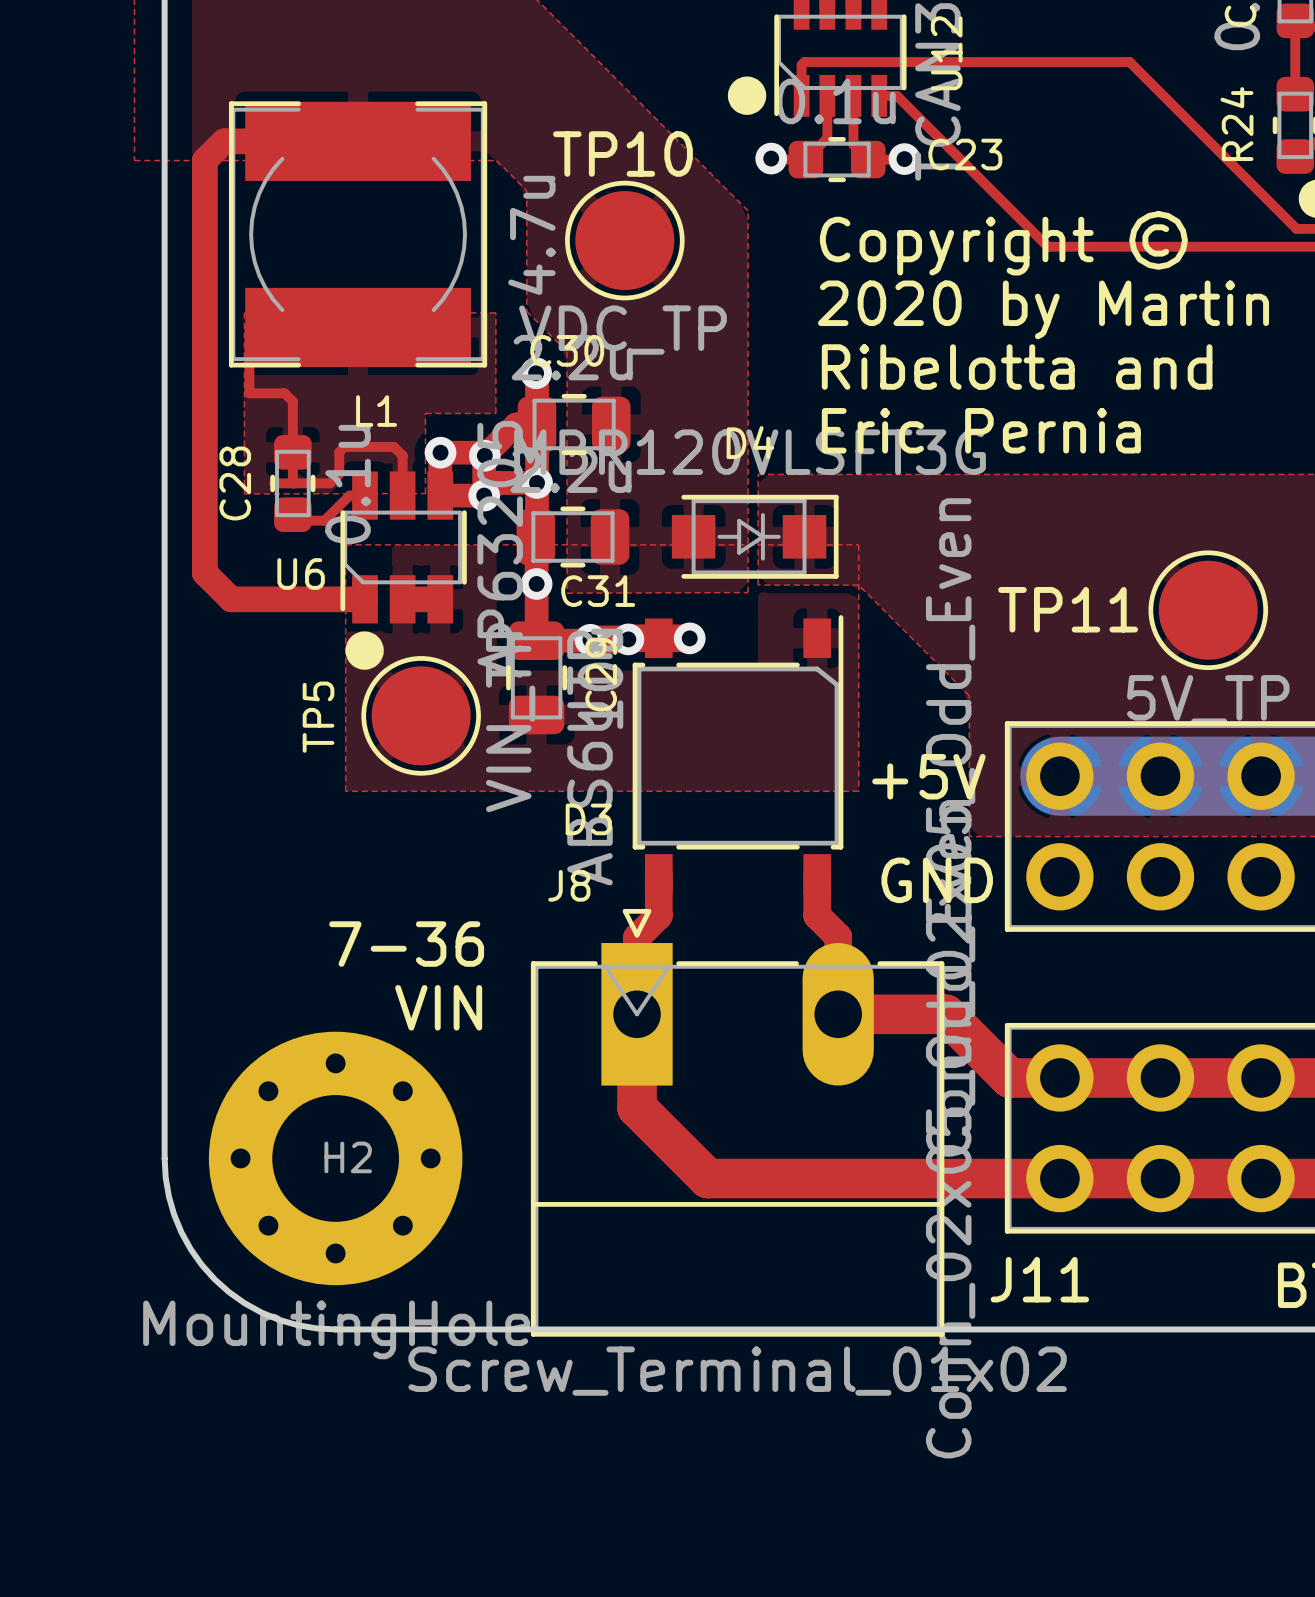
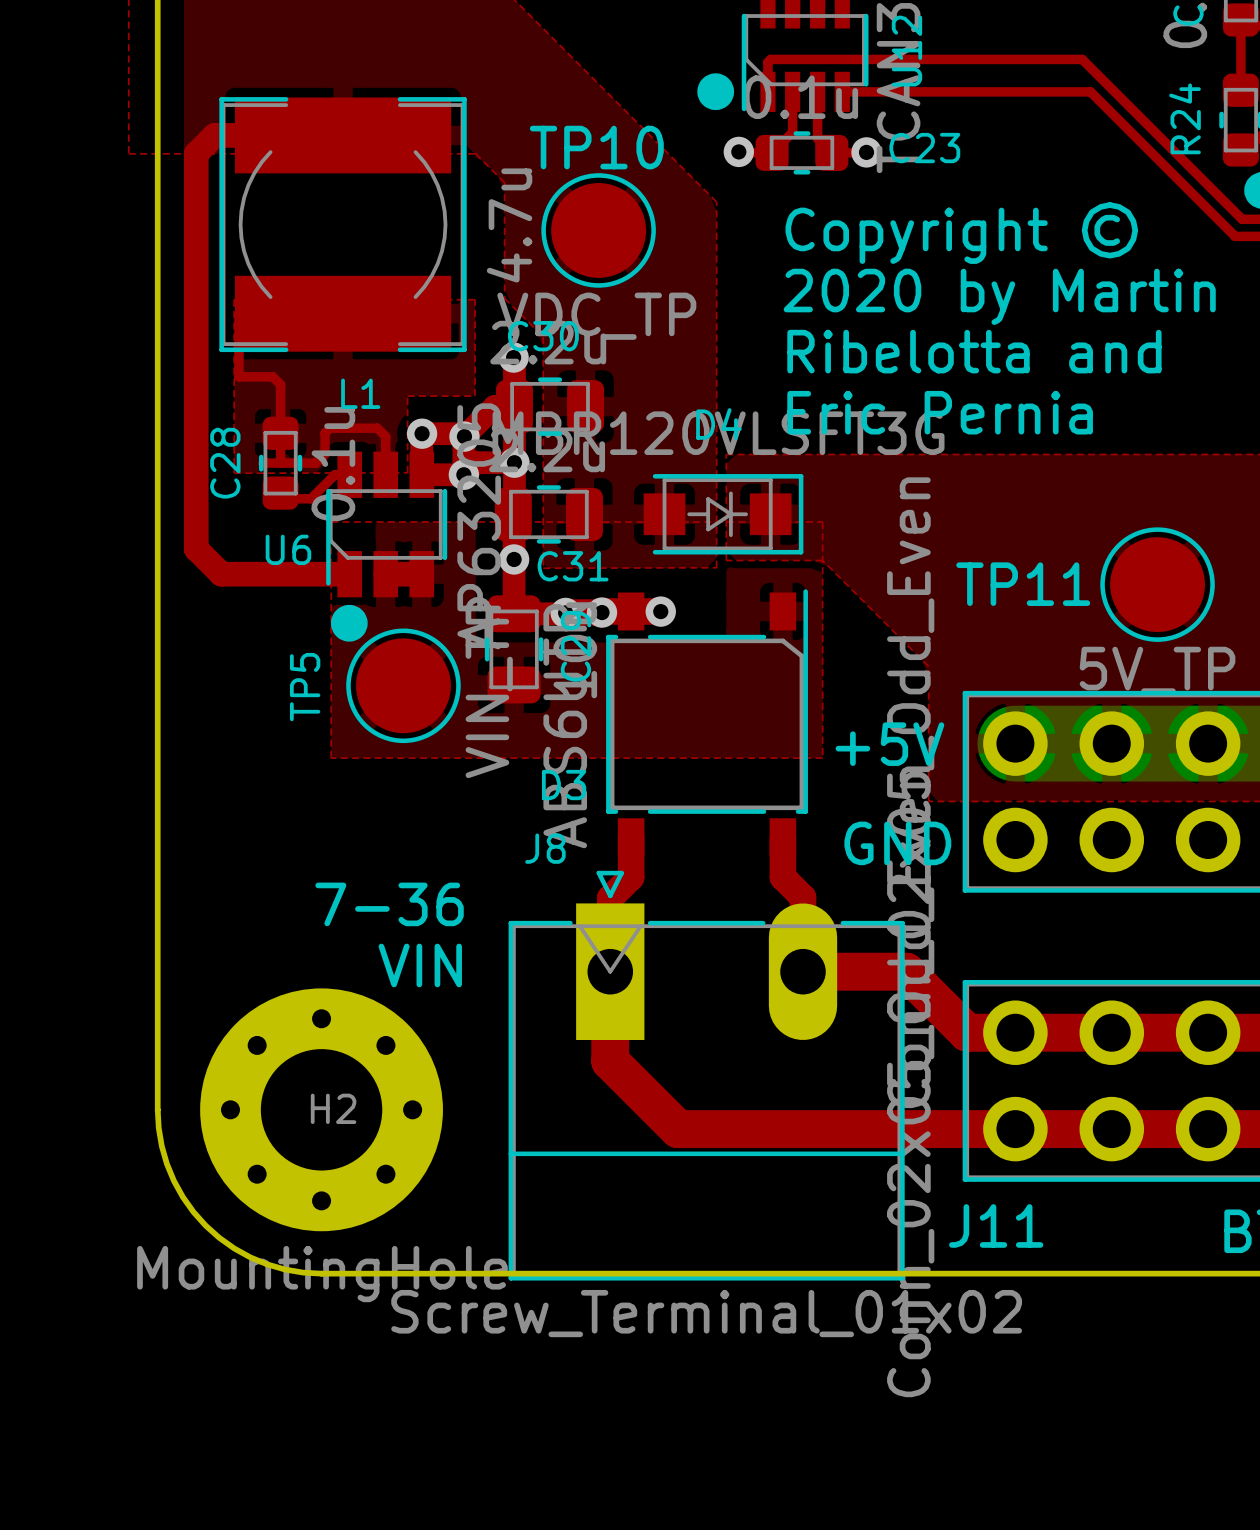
top track: (897, 95) (1047, 246) (1289, 246) -> (859, 91) (1090, 91) (1235, 236)

